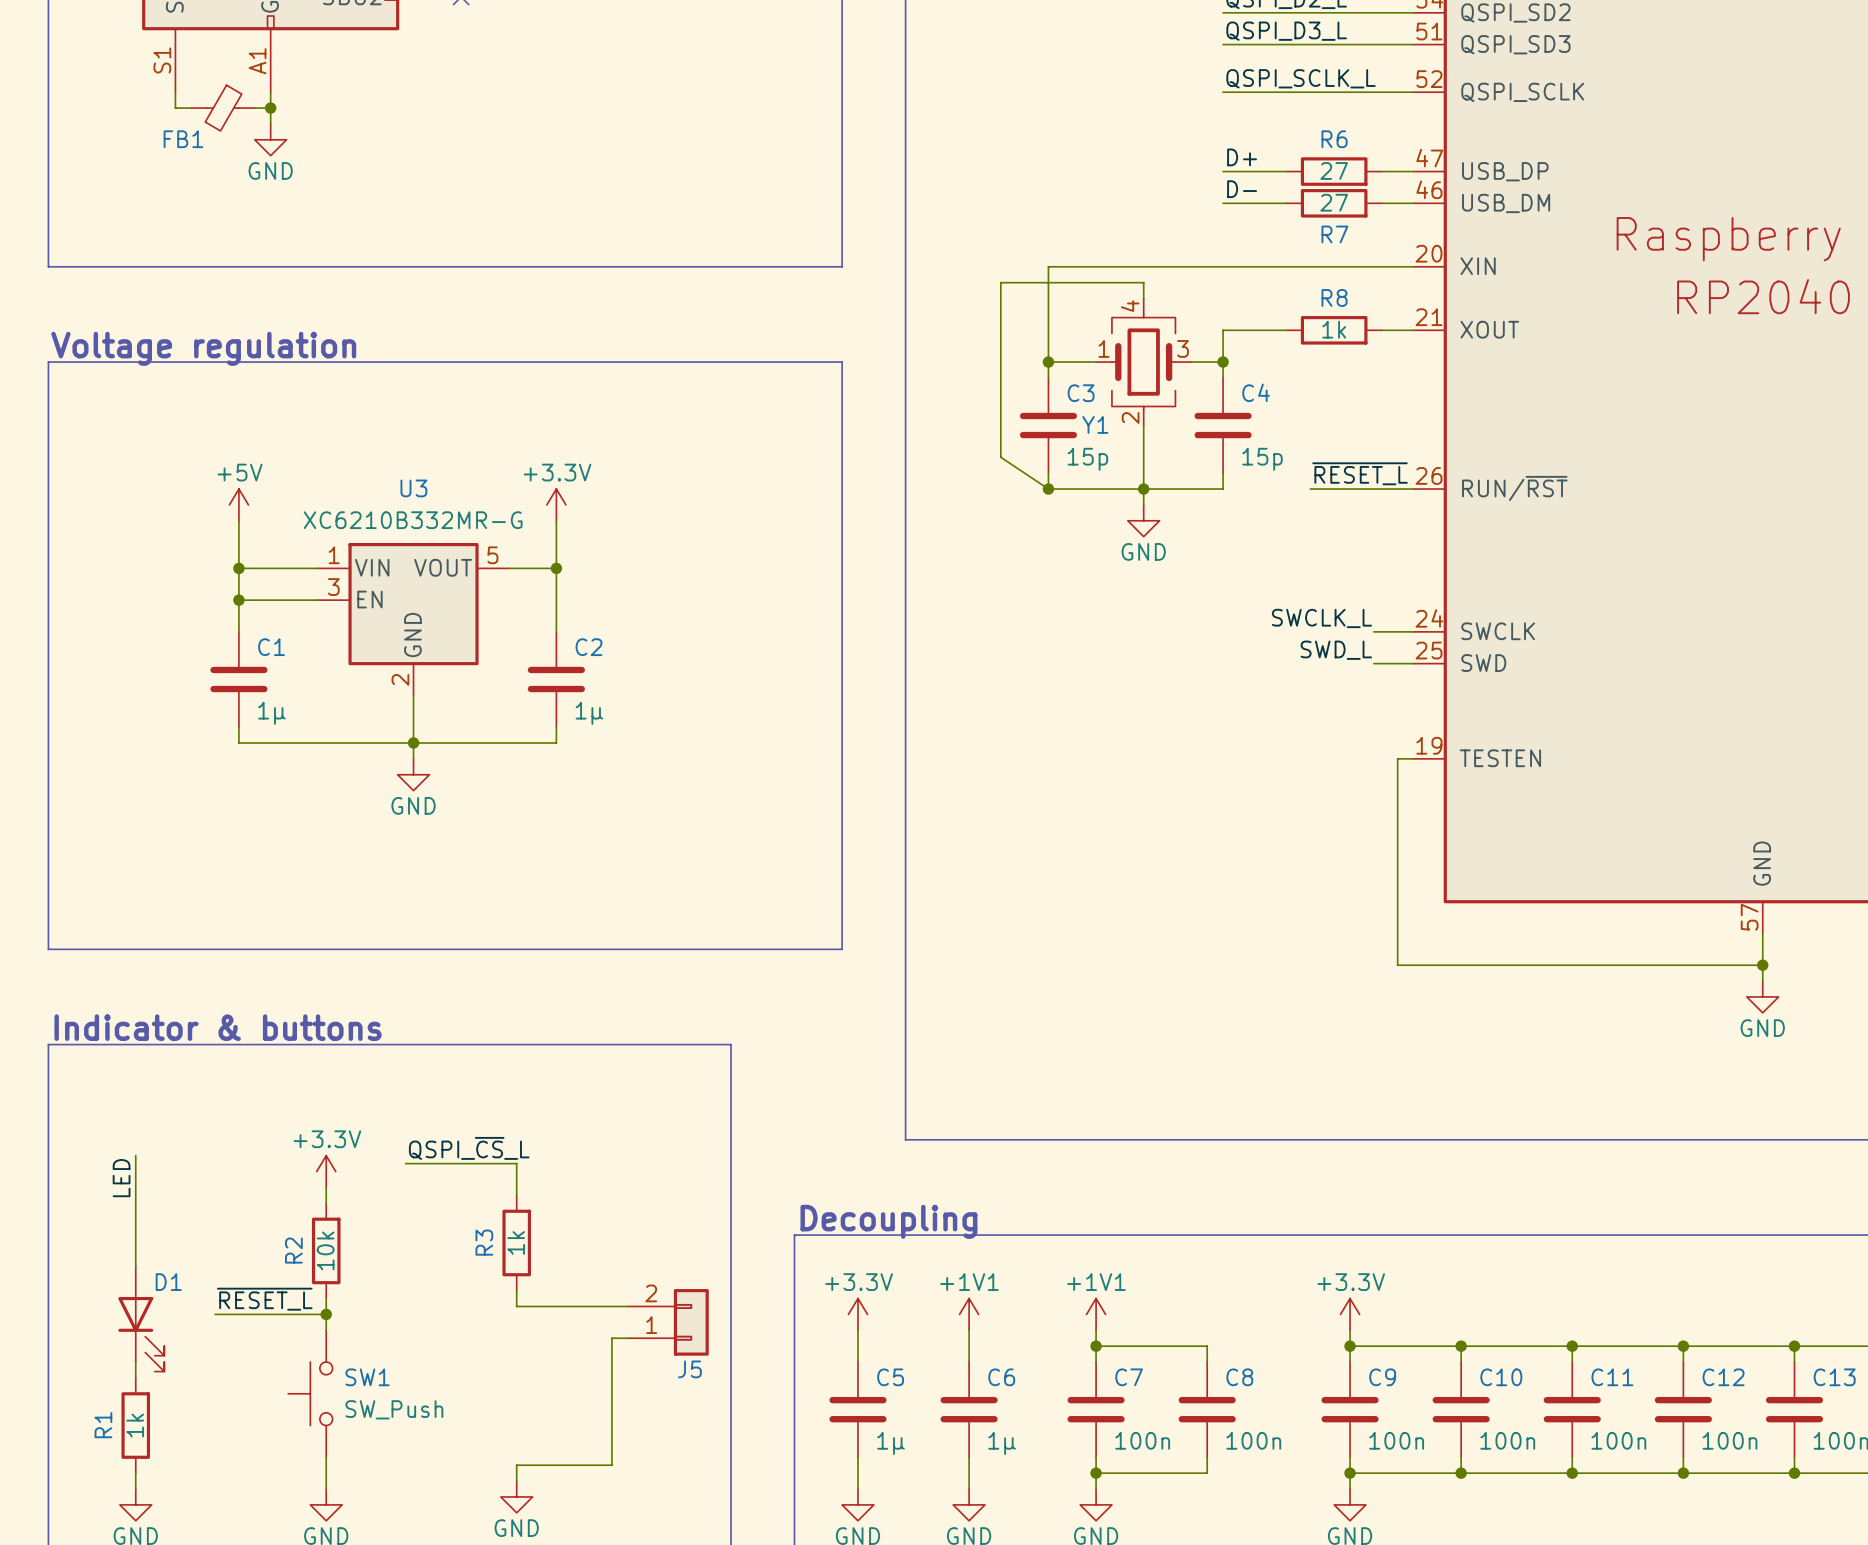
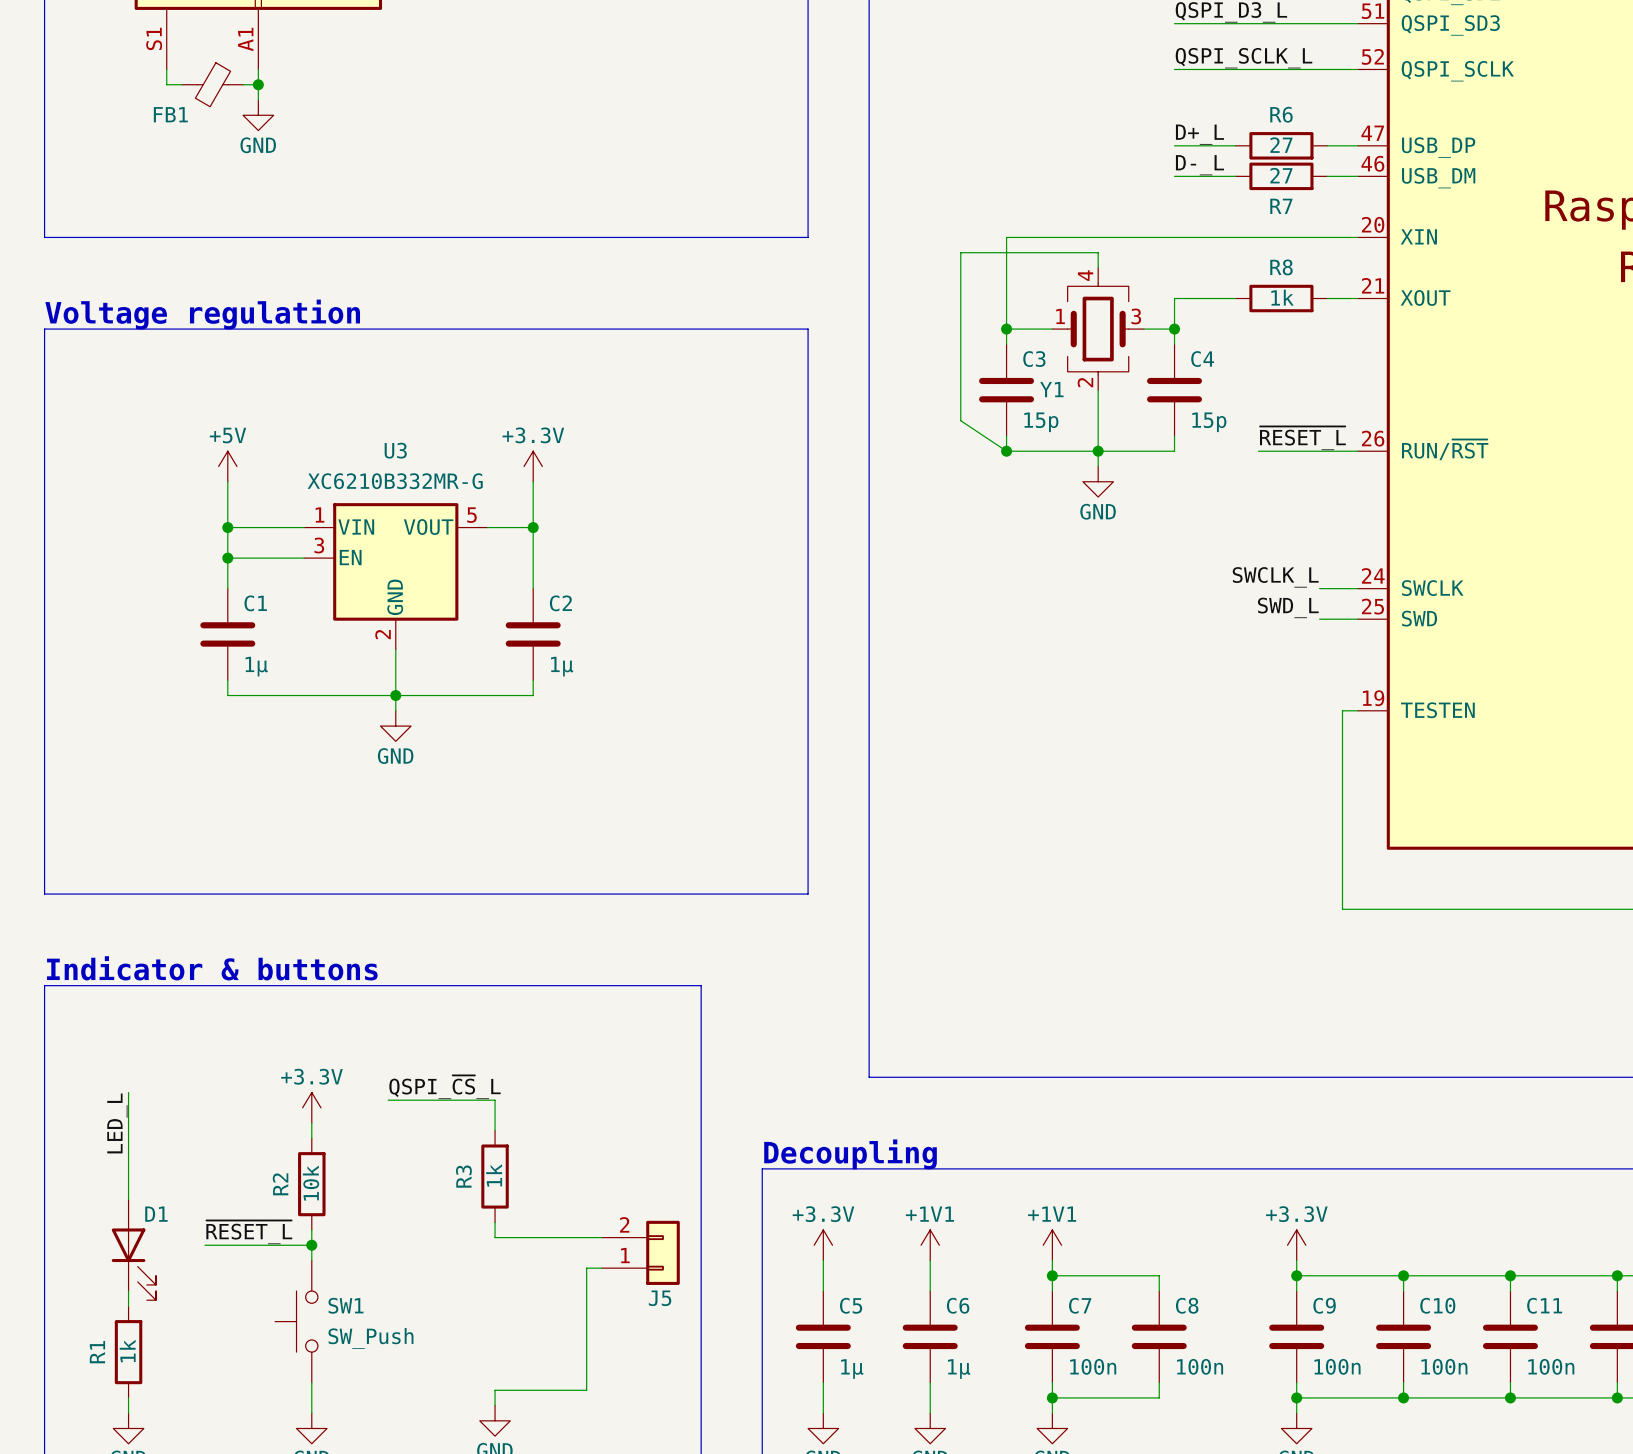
label: D+ (1242, 157) -> D+_L (1199, 134)
label: D- (1242, 189) -> D-_L (1199, 165)
label: LED (121, 1178) -> LED_L (117, 1123)

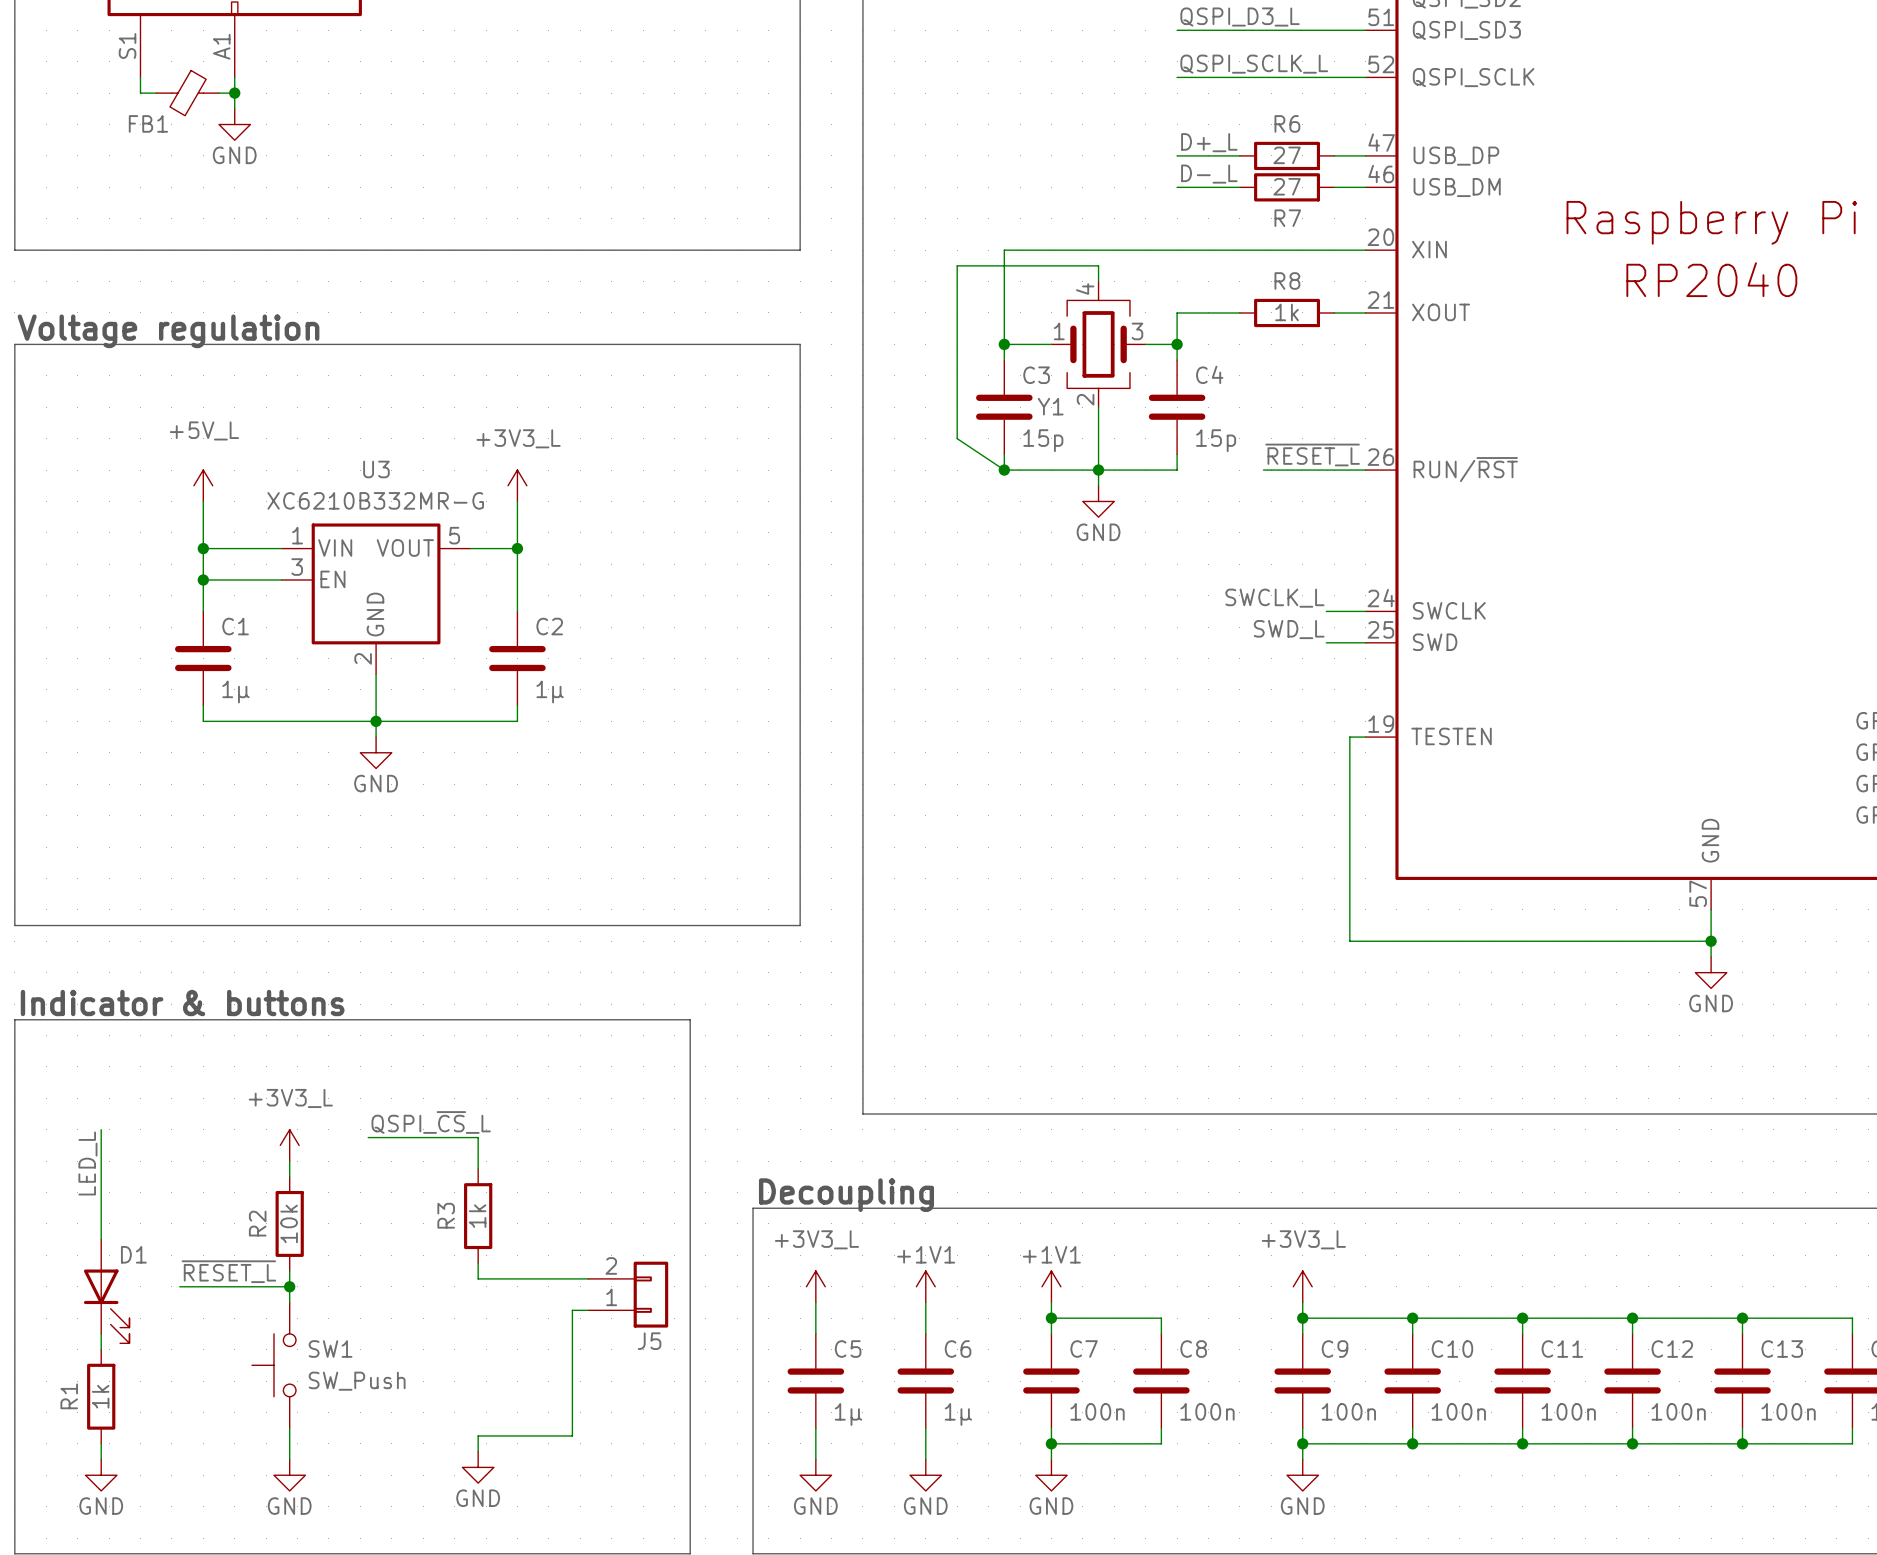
power symbol: +5V (227, 466) -> +5V_L (203, 485)
power symbol: +3.3V (533, 466) -> +3V3_L (517, 485)
power symbol: +3.3V (311, 1107) -> +3V3_L (289, 1145)
power symbol: +3.3V (823, 1245) -> +3V3_L (815, 1286)
power symbol: +3.3V (1296, 1245) -> +3V3_L (1302, 1286)

